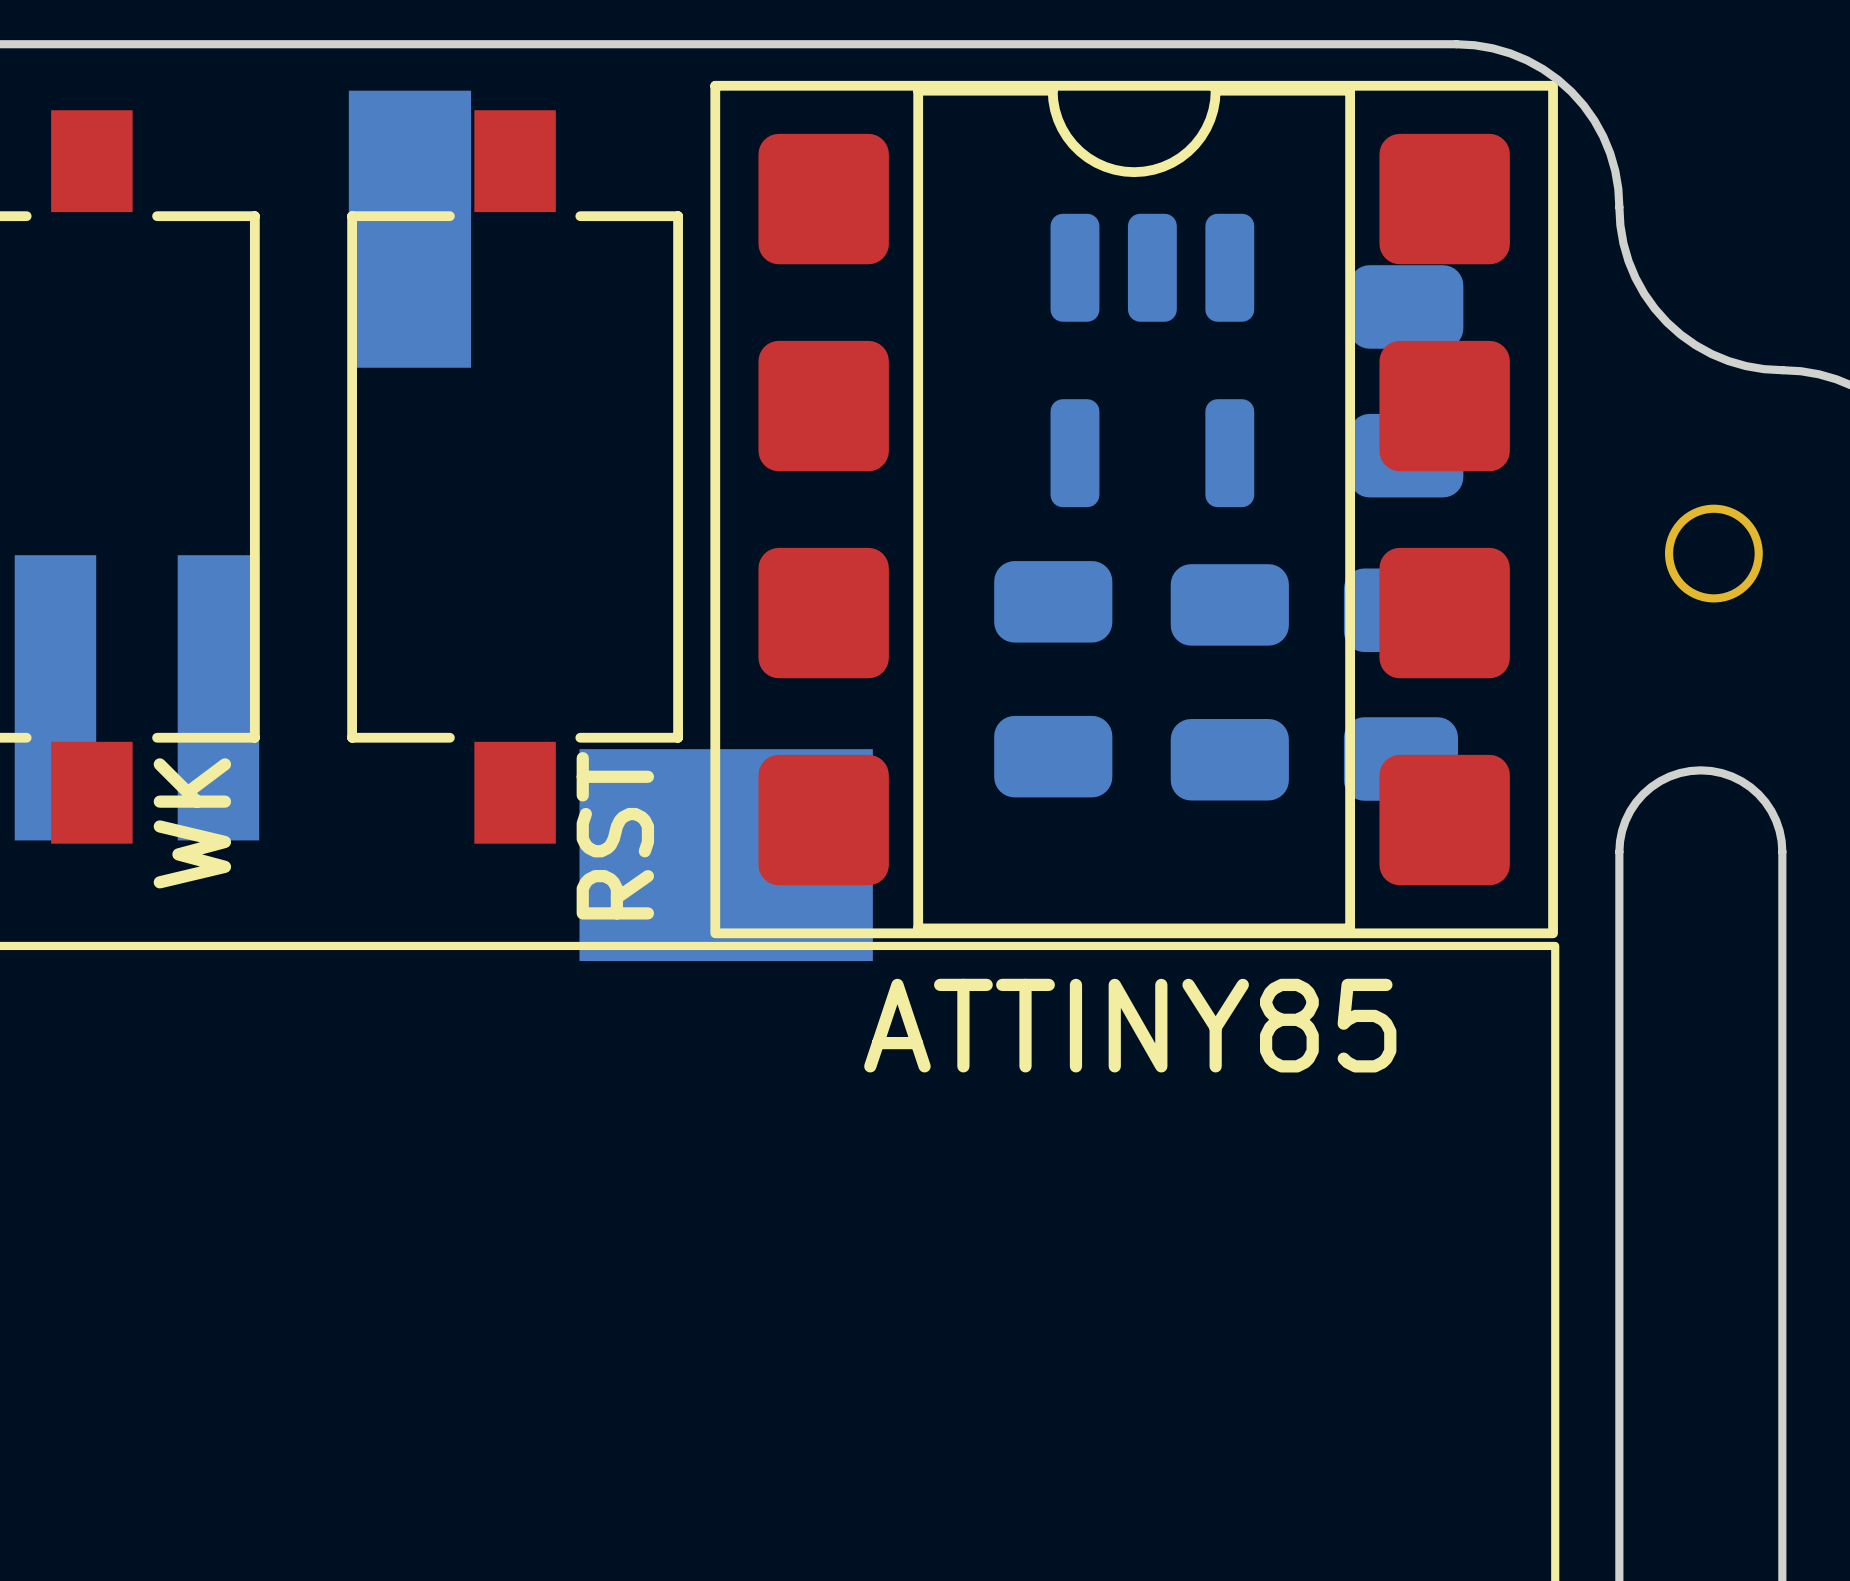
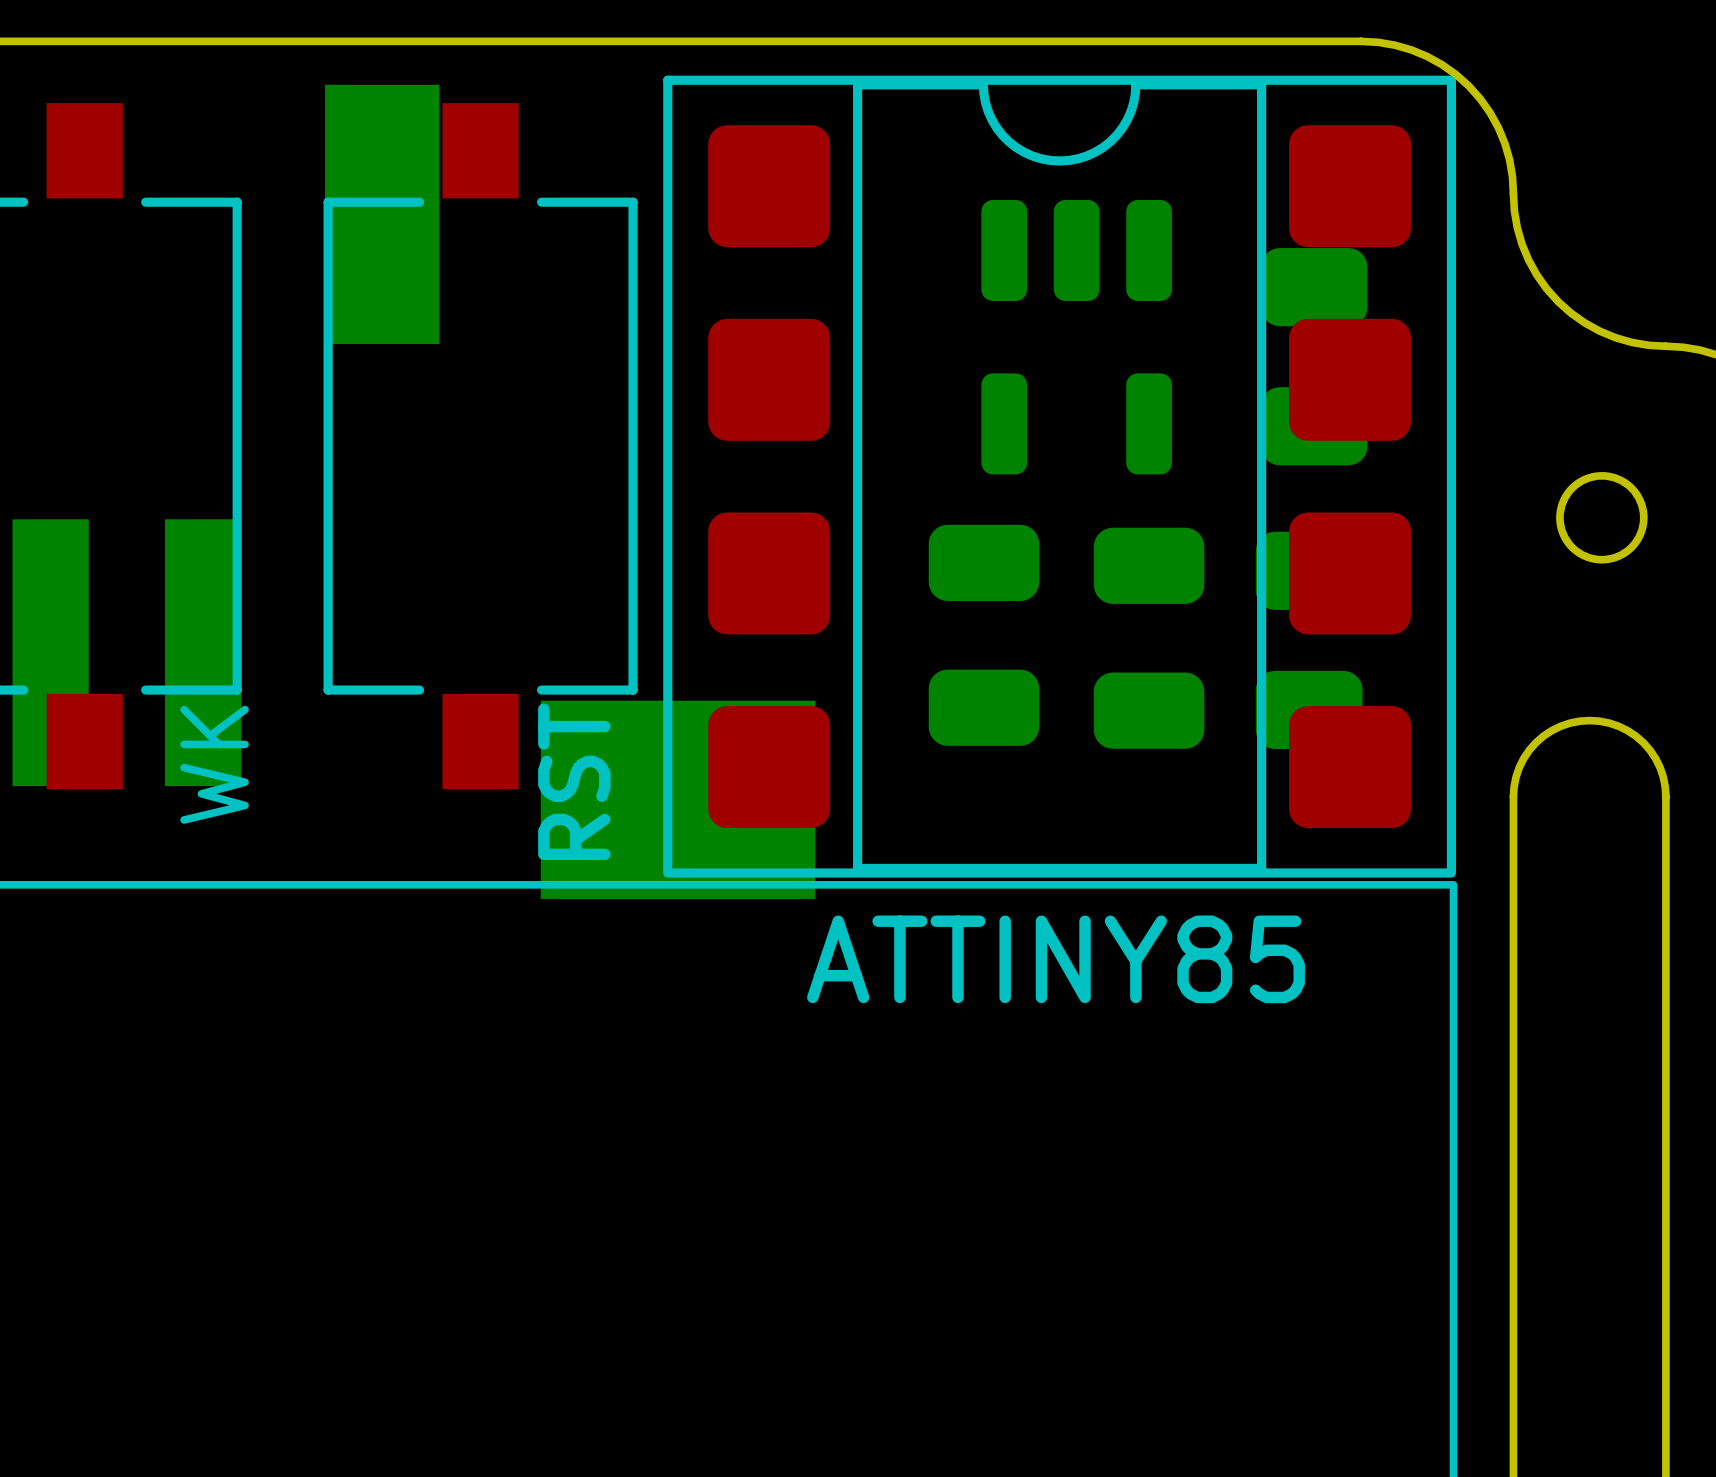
WK name position: WK (192, 823) -> WK (214, 764)

